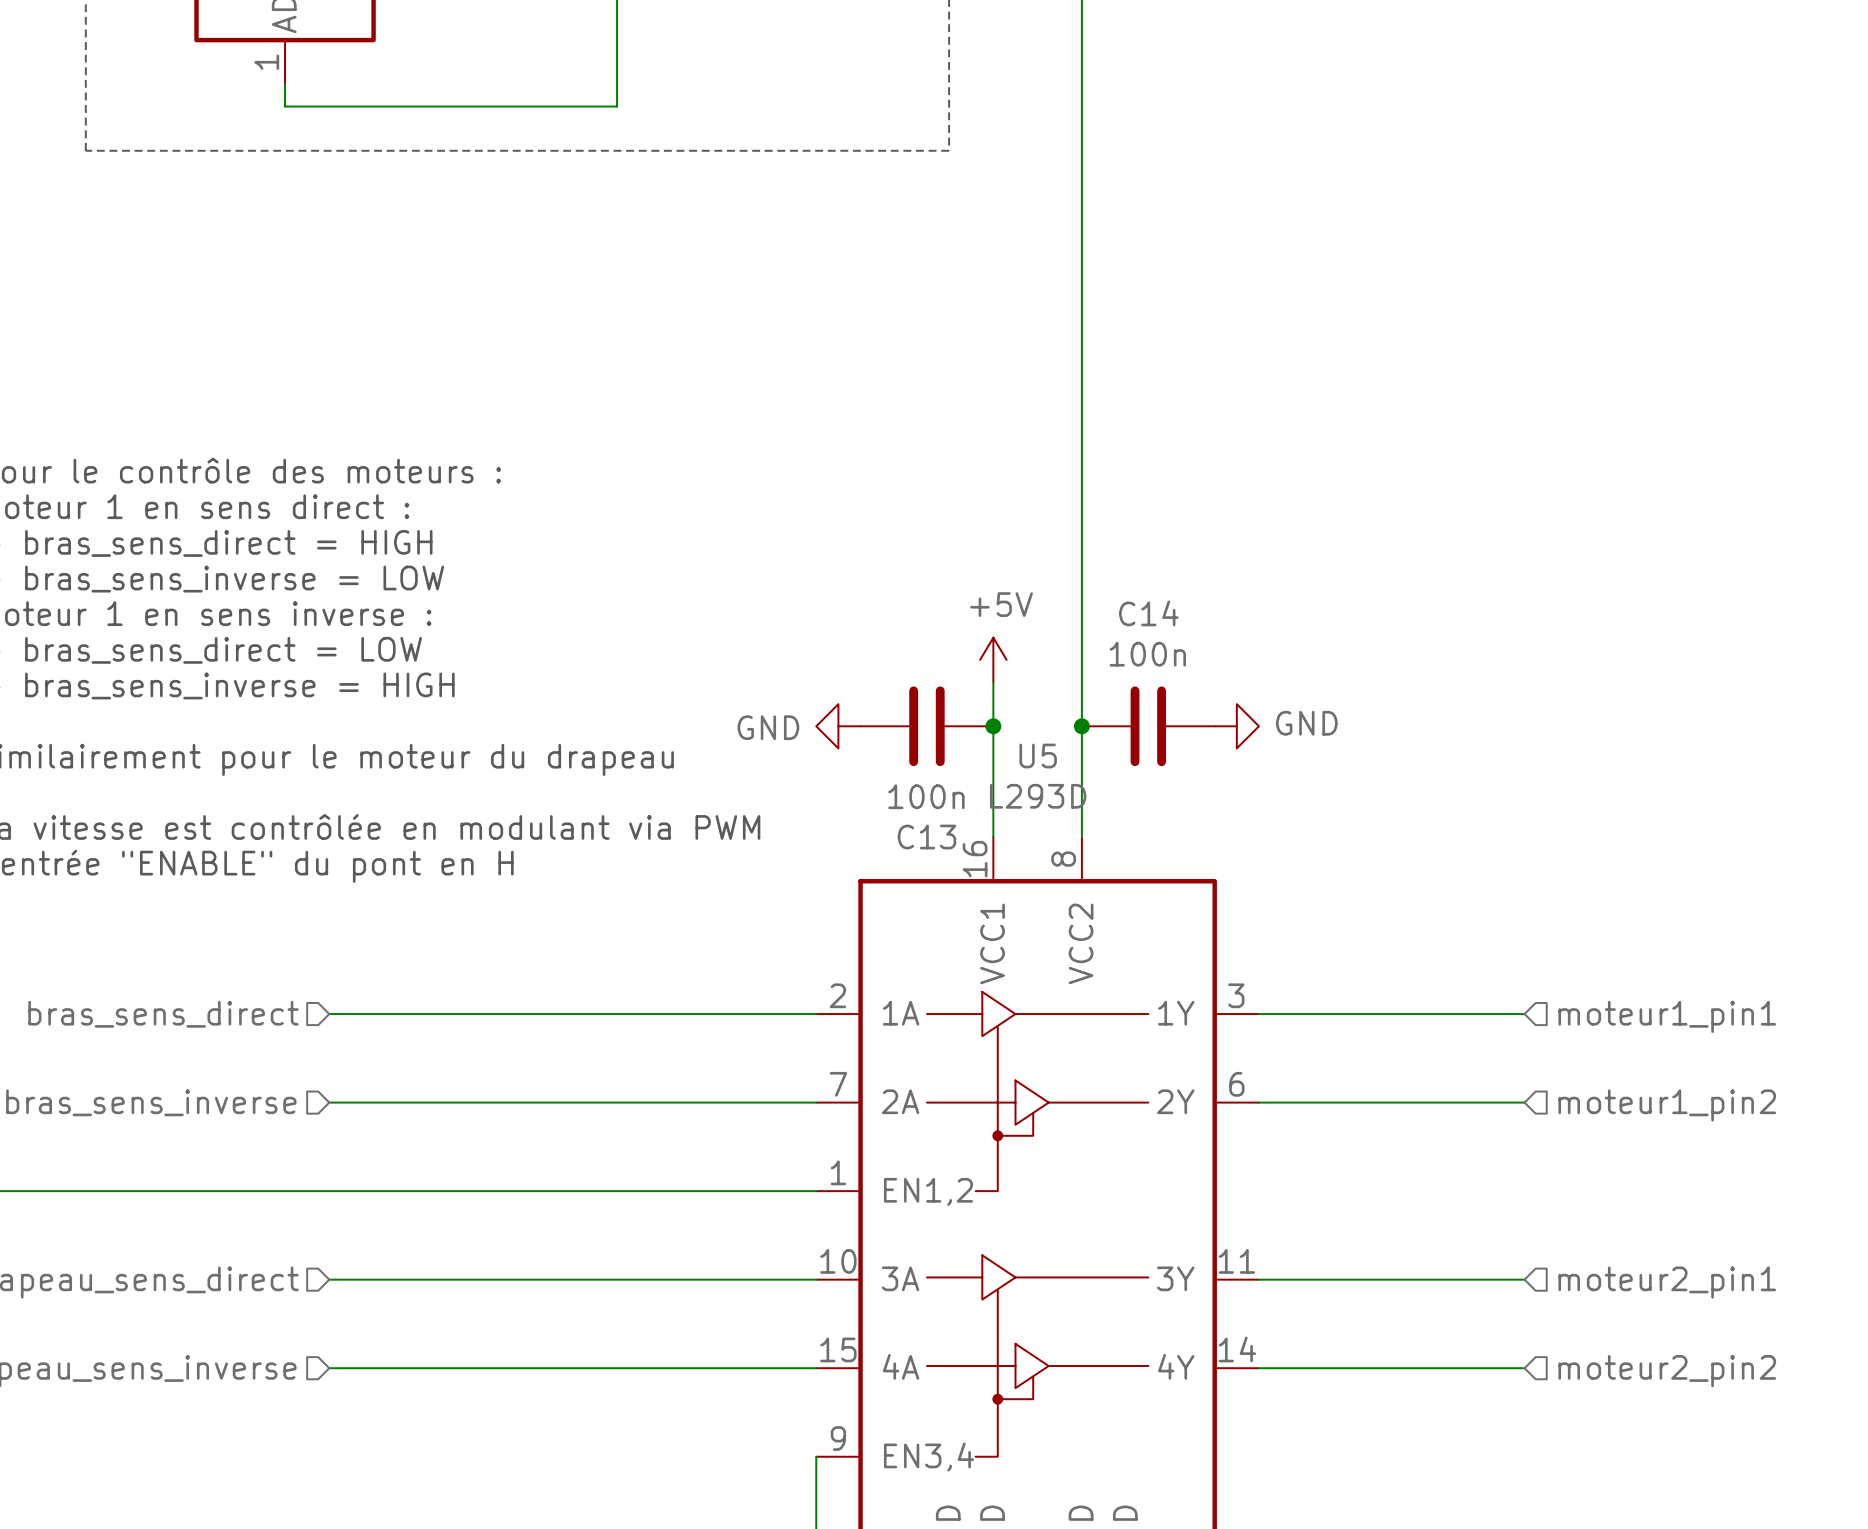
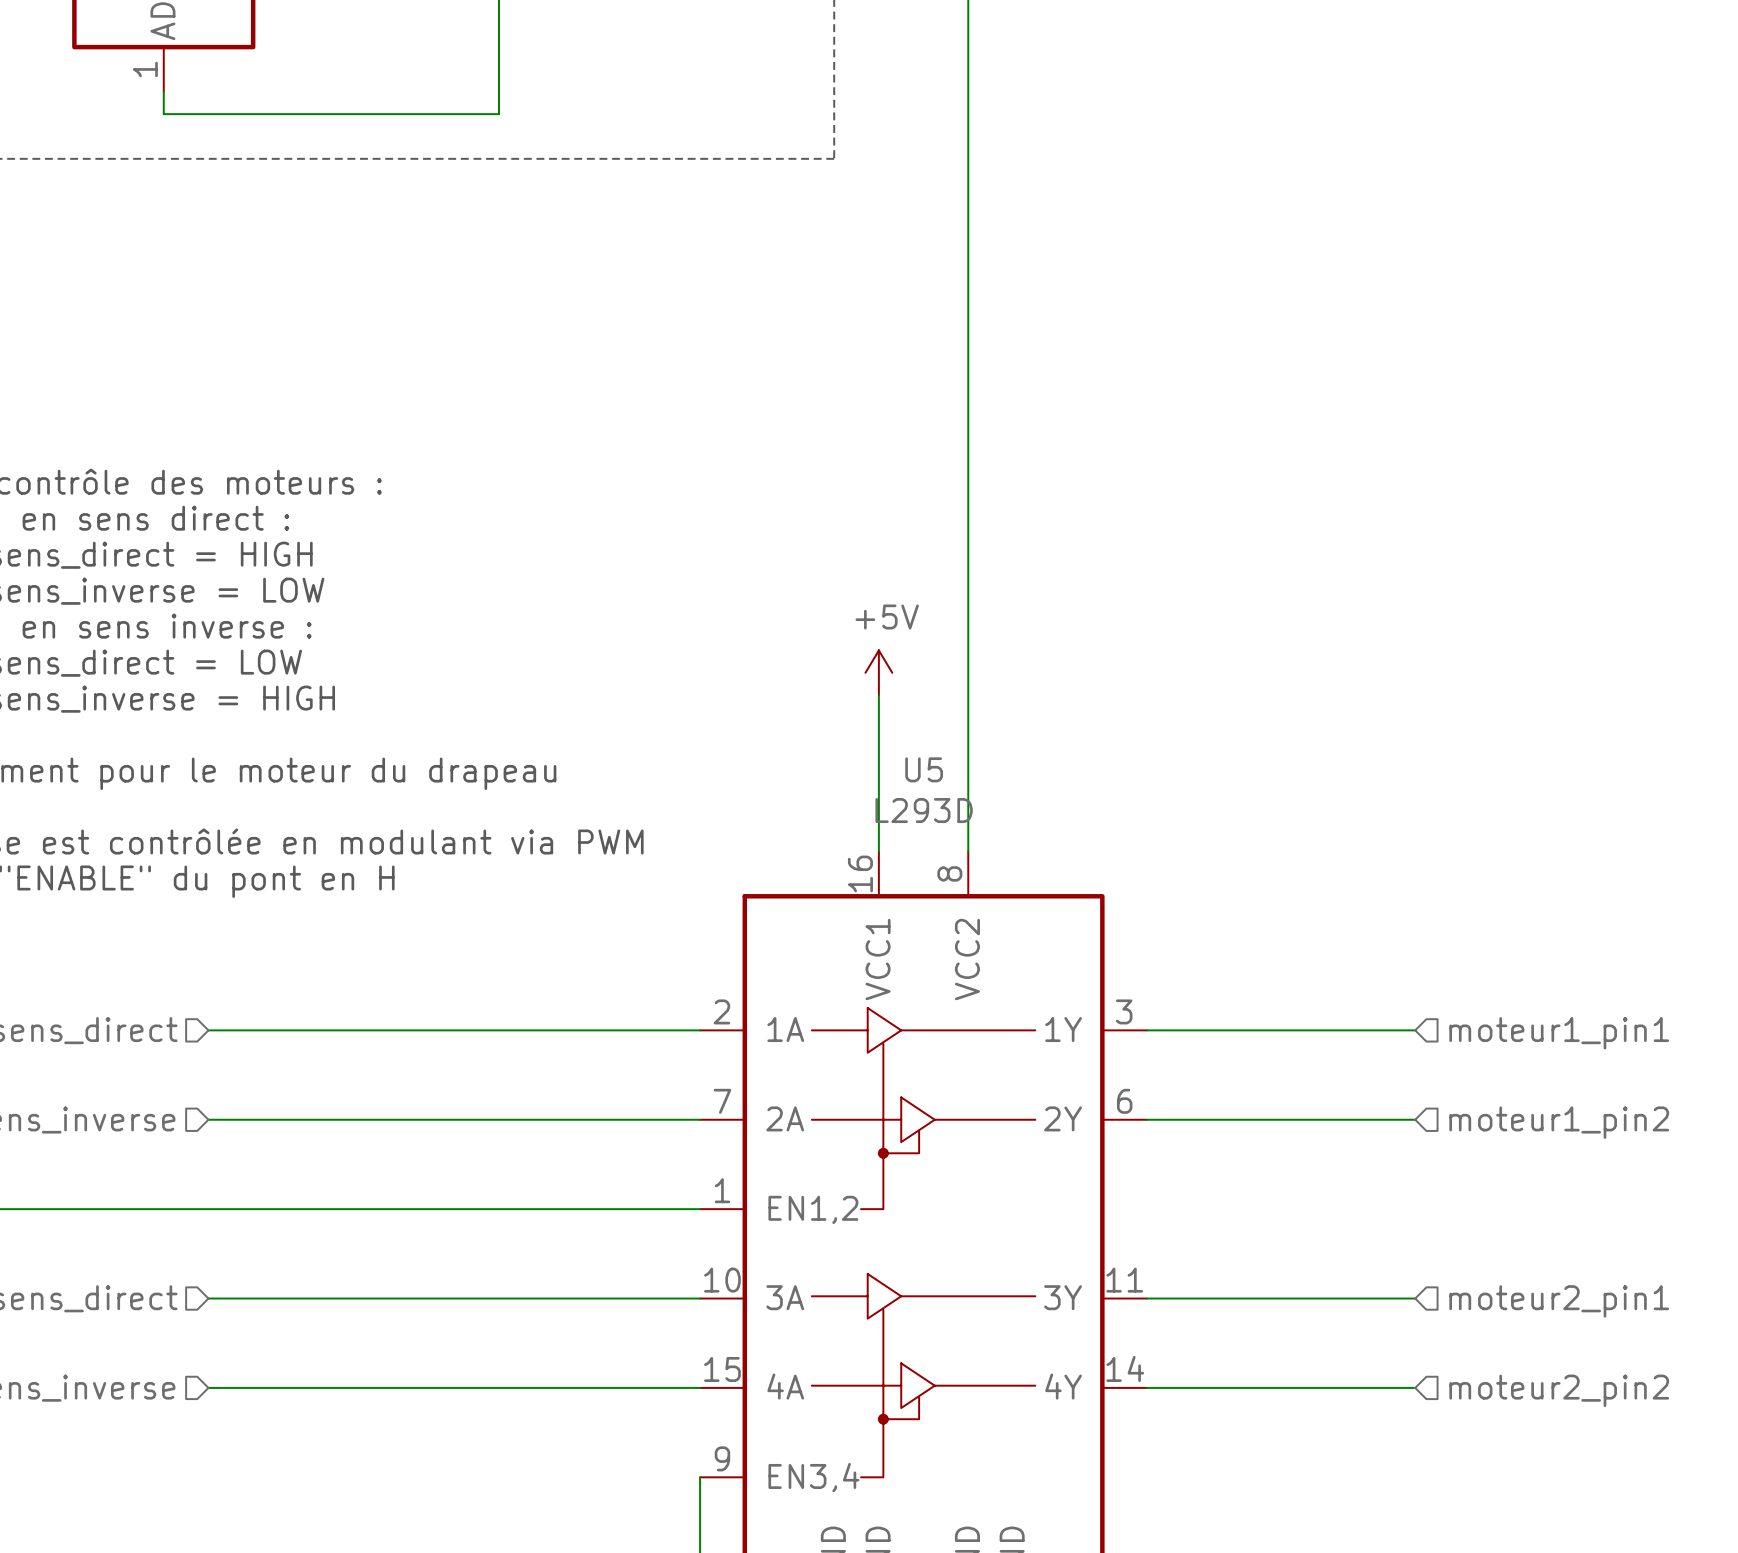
power symbol: GND (838, 726) -> none
C13: 100n (926, 726) -> none
junction: (993, 726) -> none
junction: (1081, 726) -> none
C14: 100n (1148, 726) -> none
power symbol: GND (1236, 726) -> none

